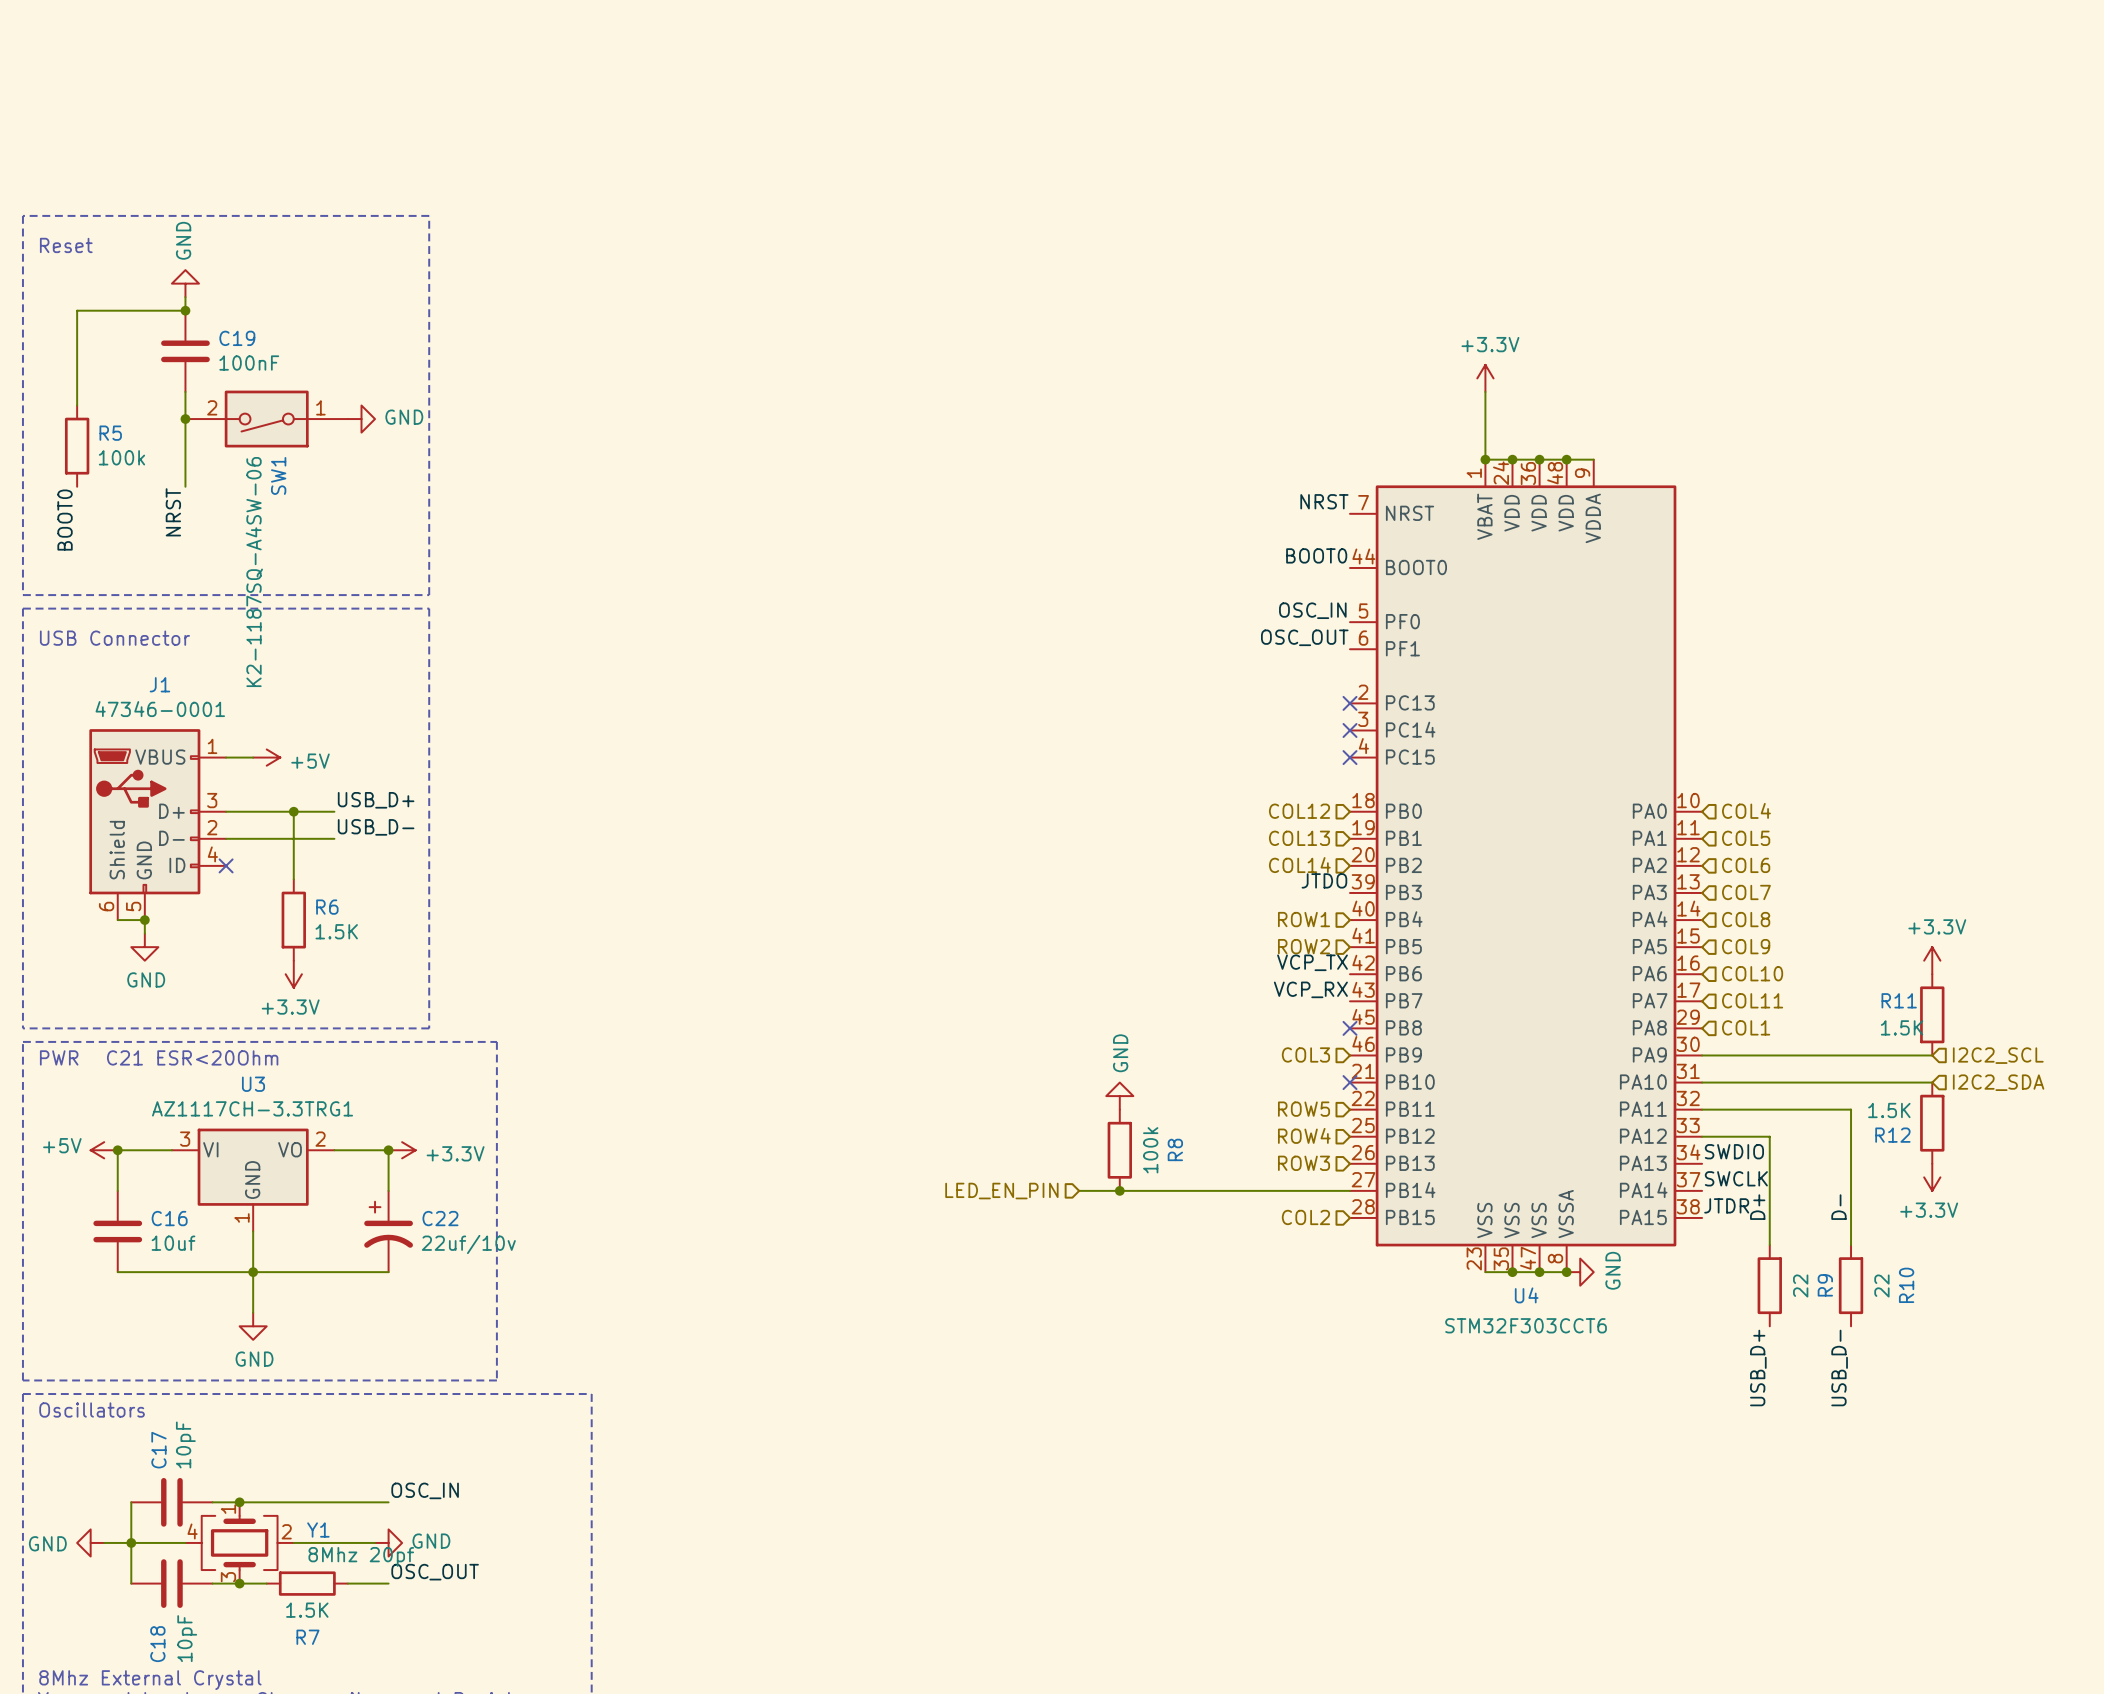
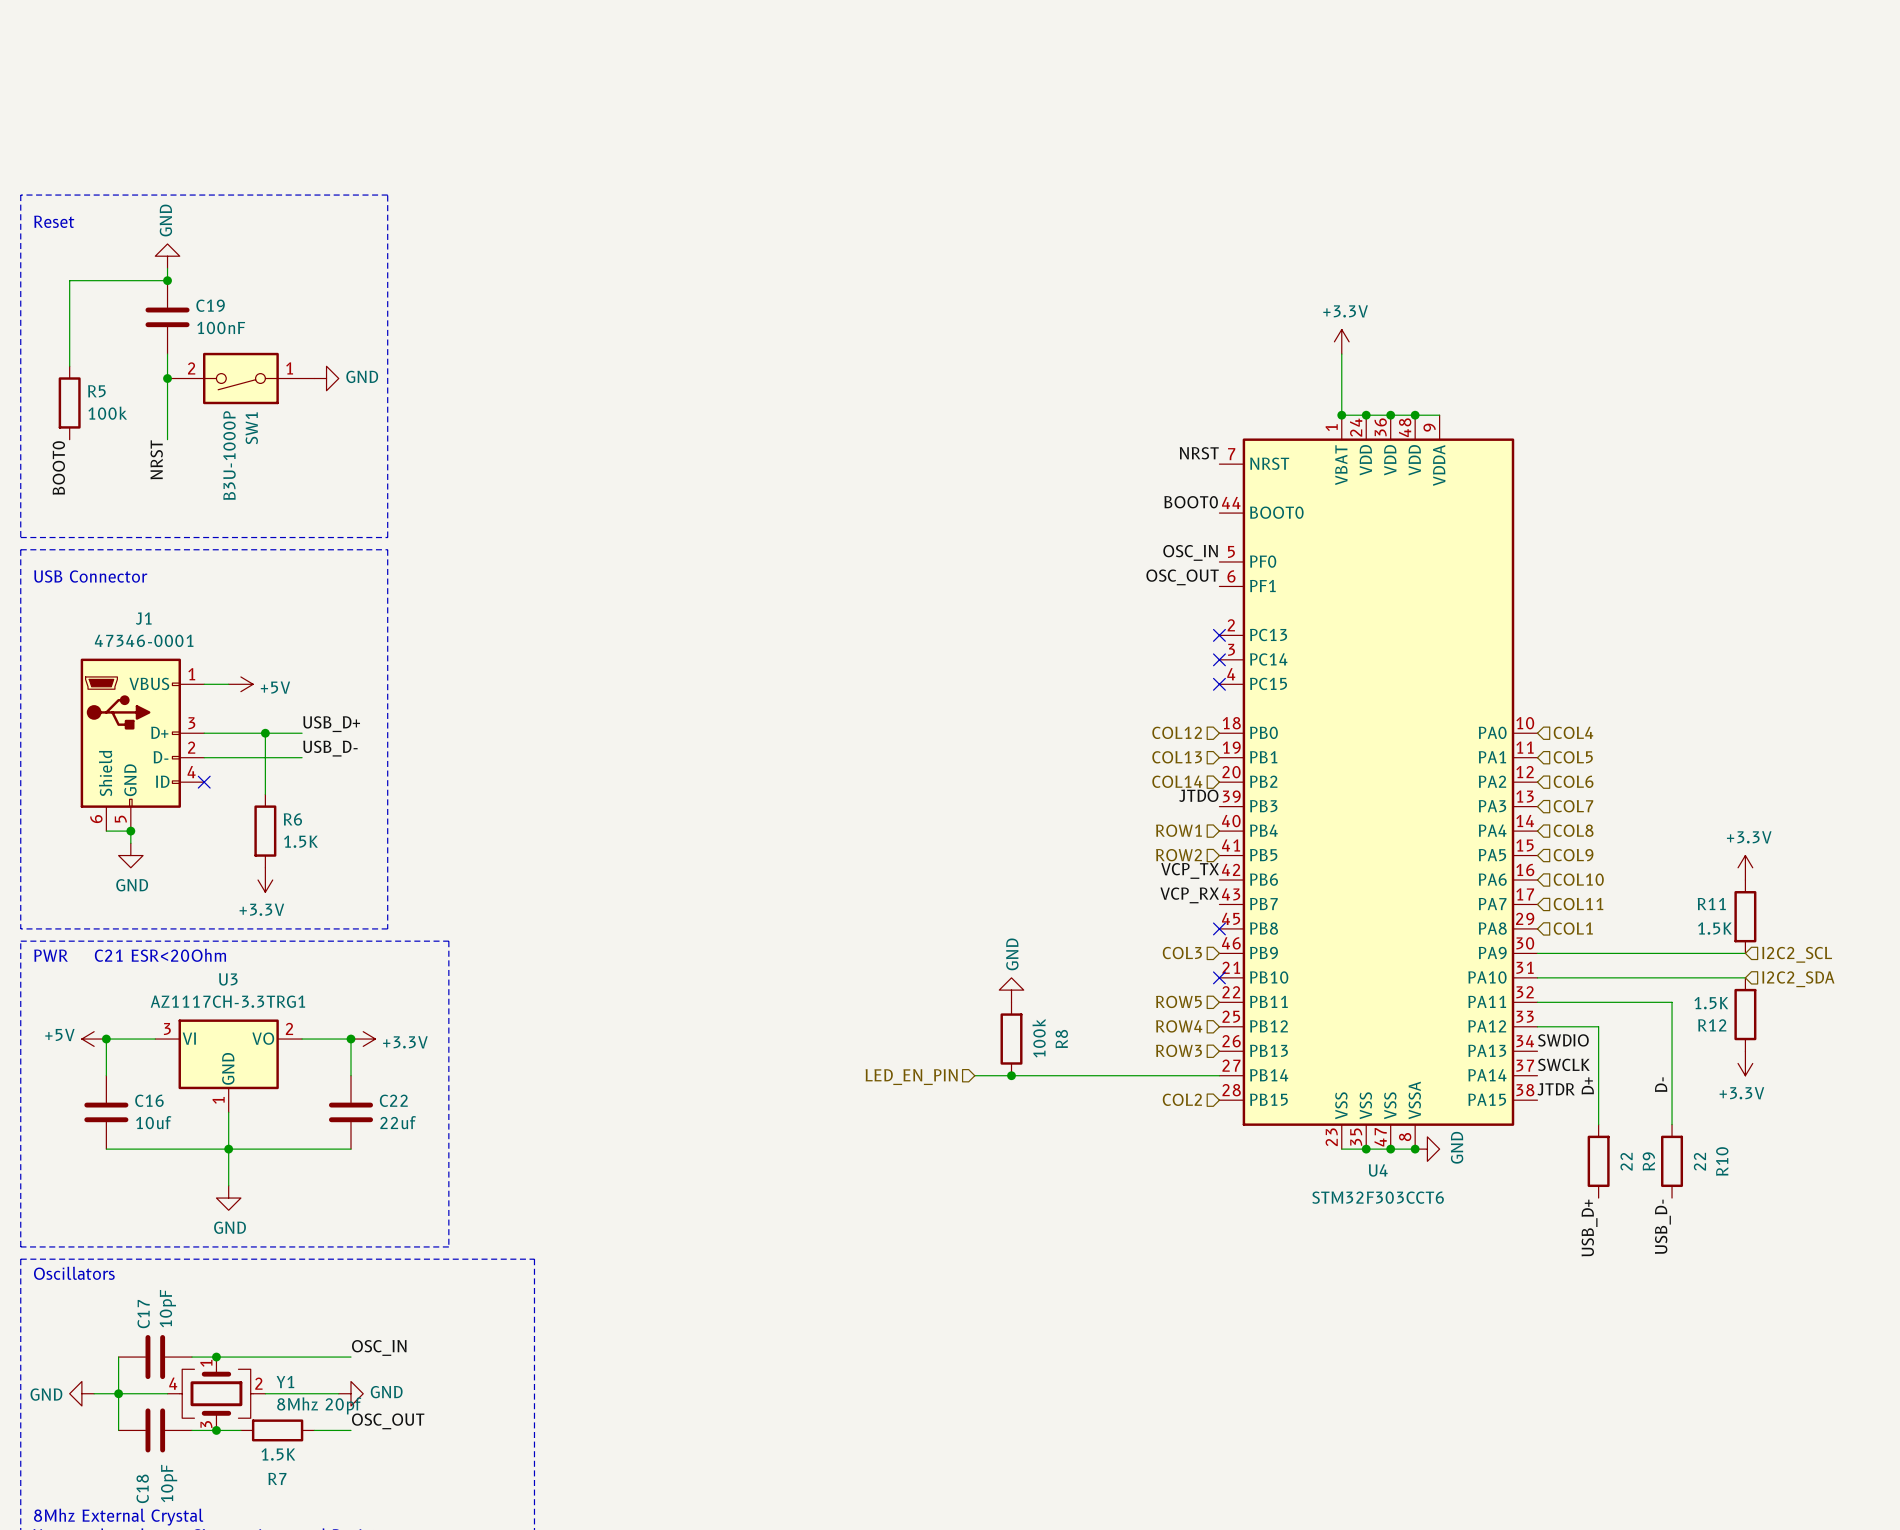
SW1 value: K2-1187SQ-A4SW-06 (254, 572) -> B3U-1000P (229, 455)
C22 symbol: [364, 1190, 413, 1273] -> [328, 1075, 374, 1150]
C22 value: 22uf/10v (468, 1244) -> 22uf (398, 1122)

